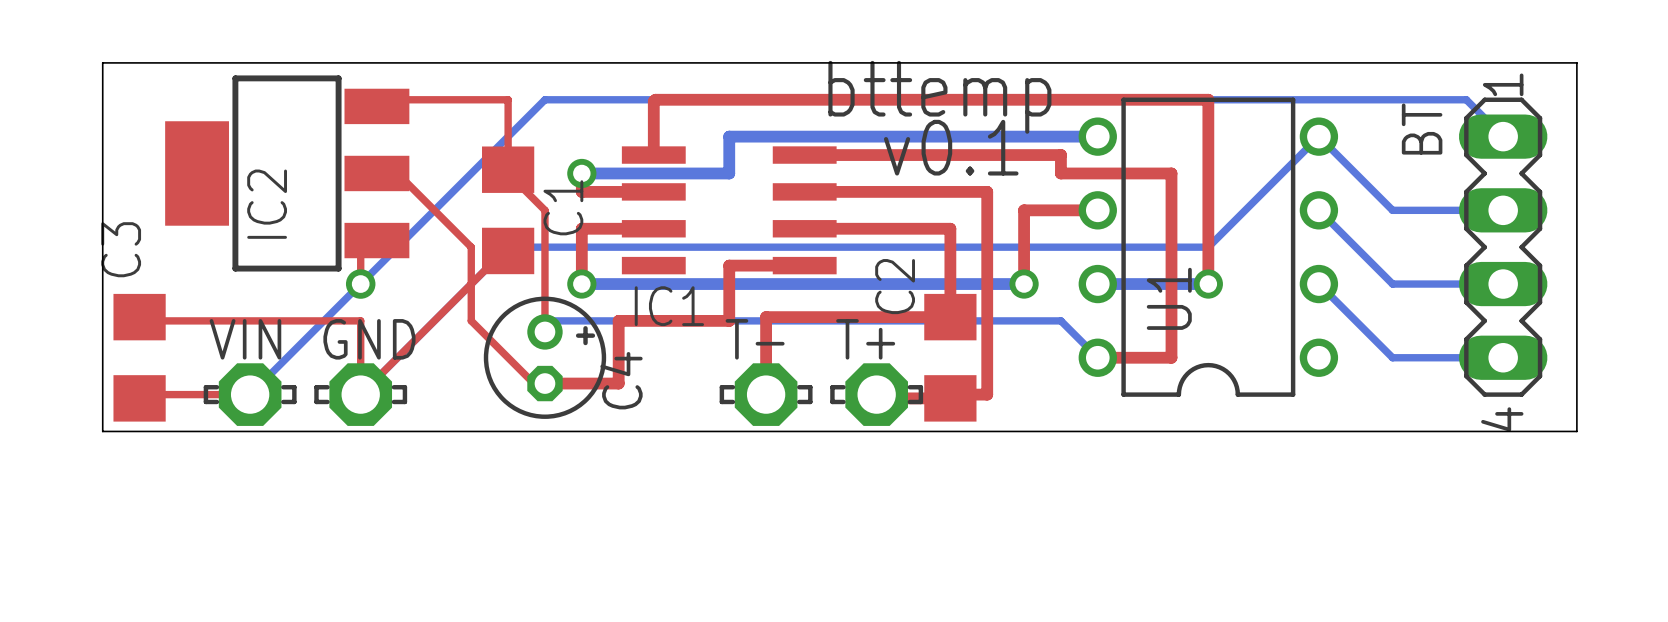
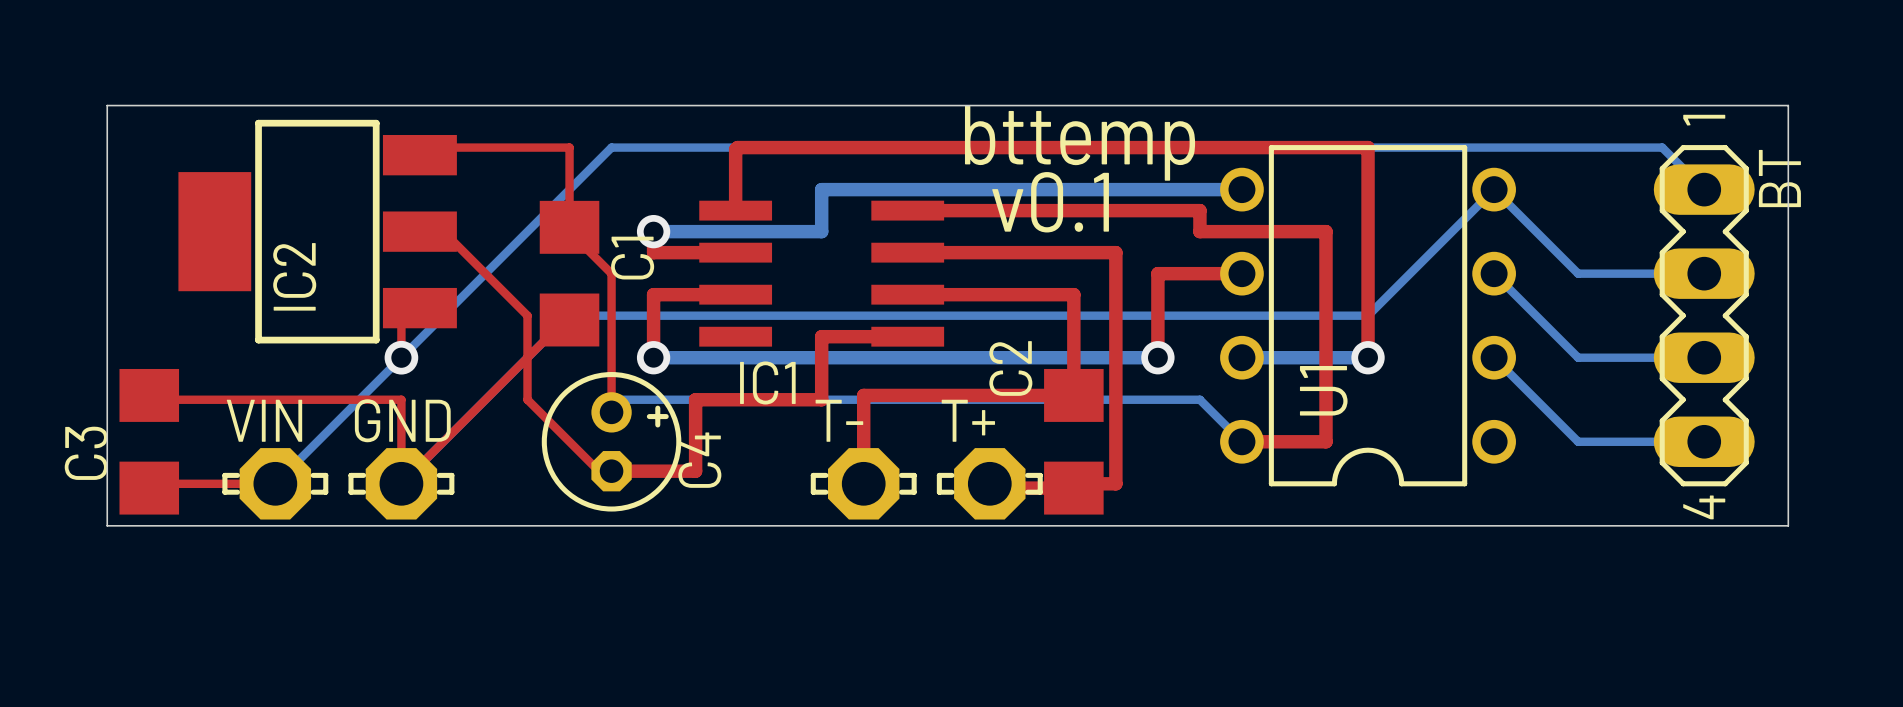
BT name position: BT (1422, 129) -> BT (1779, 178)
C3 name position: C3 (121, 249) -> C3 (86, 453)

